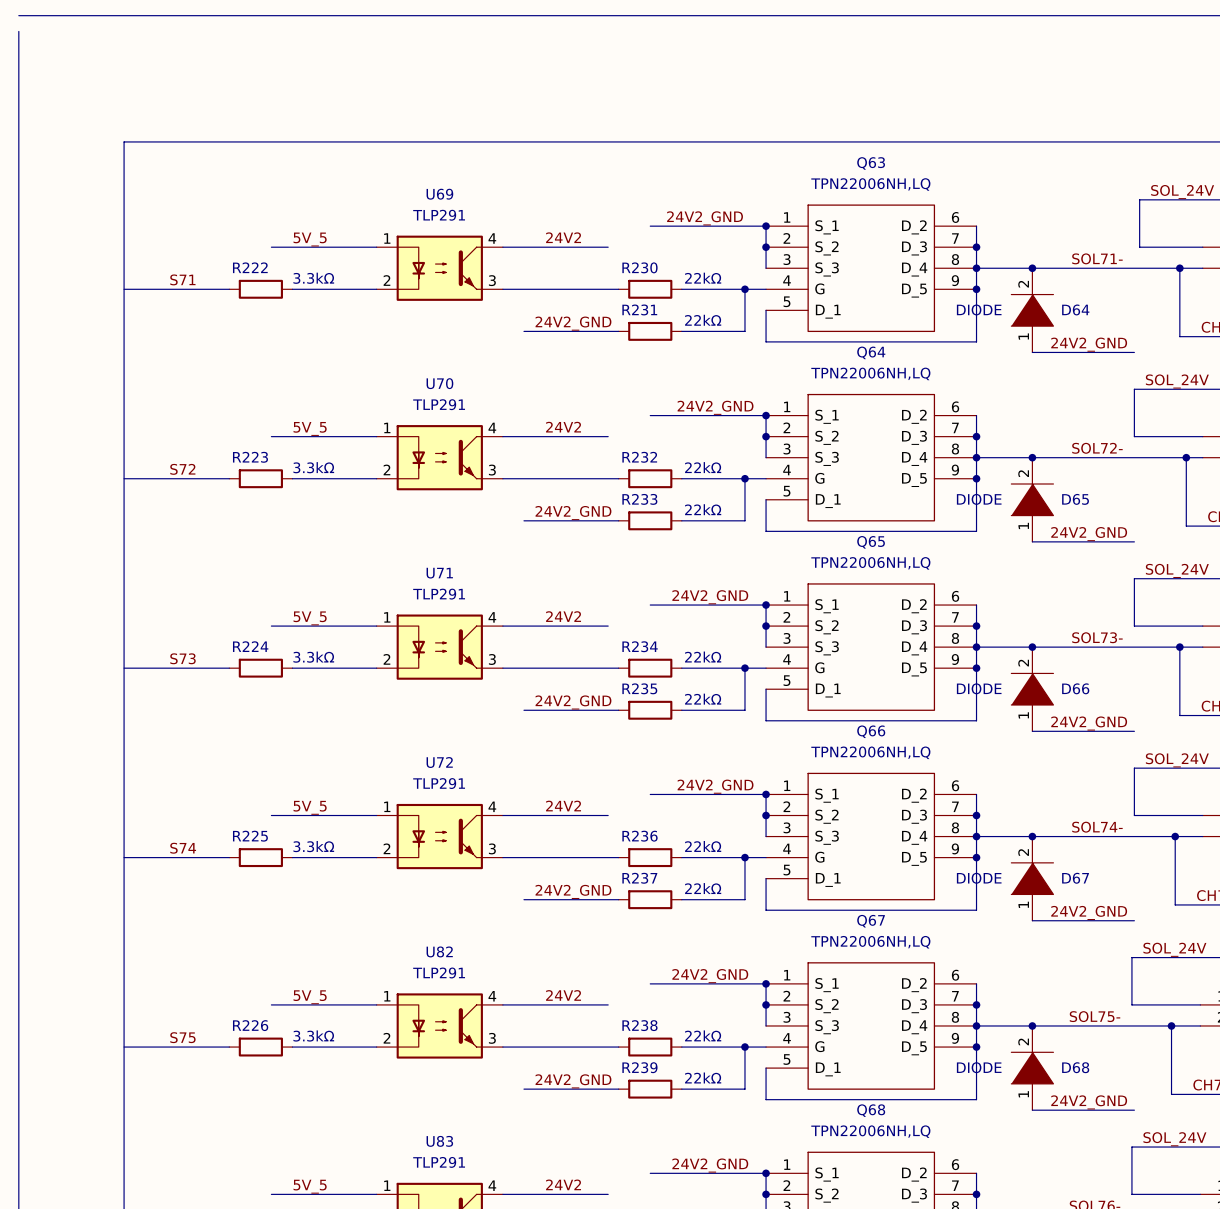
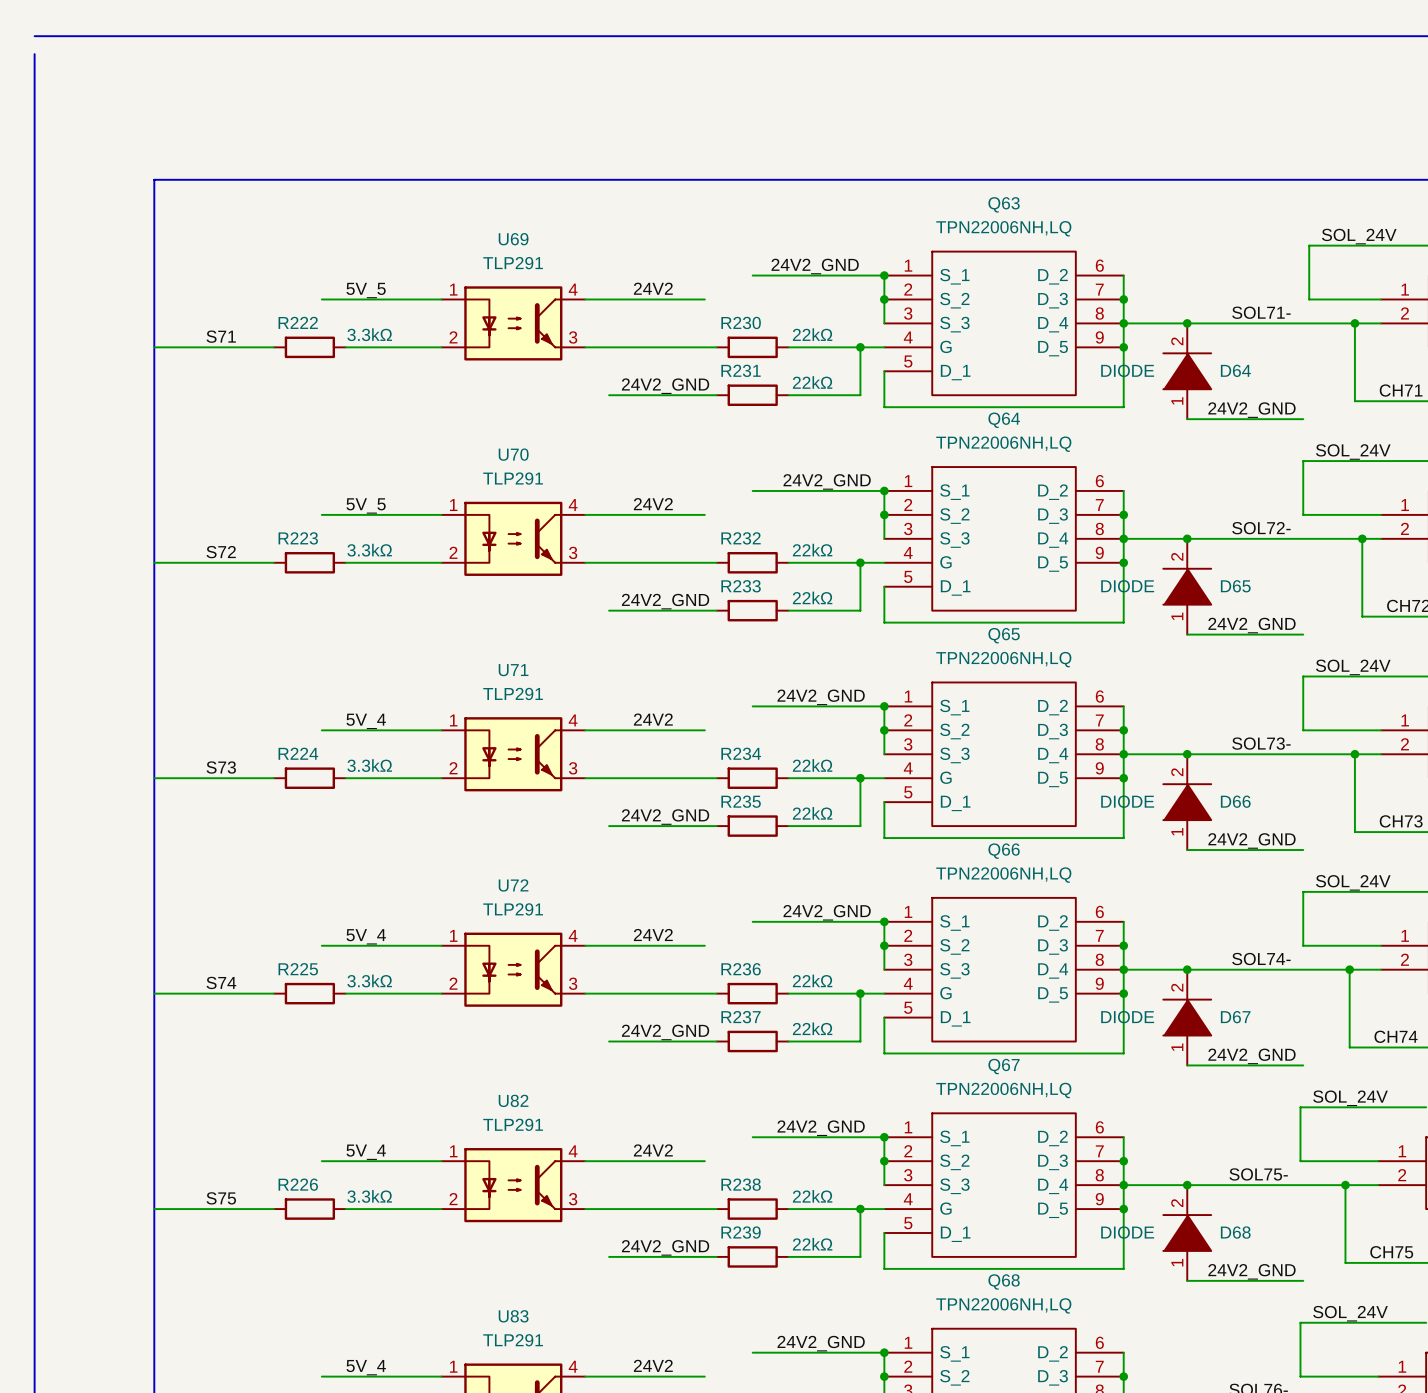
label: 5V_5 (310, 618) -> 5V_4 (366, 721)
label: 5V_5 (310, 807) -> 5V_4 (366, 936)
label: 5V_5 (310, 997) -> 5V_4 (366, 1152)
label: 5V_5 (310, 1186) -> 5V_4 (366, 1367)

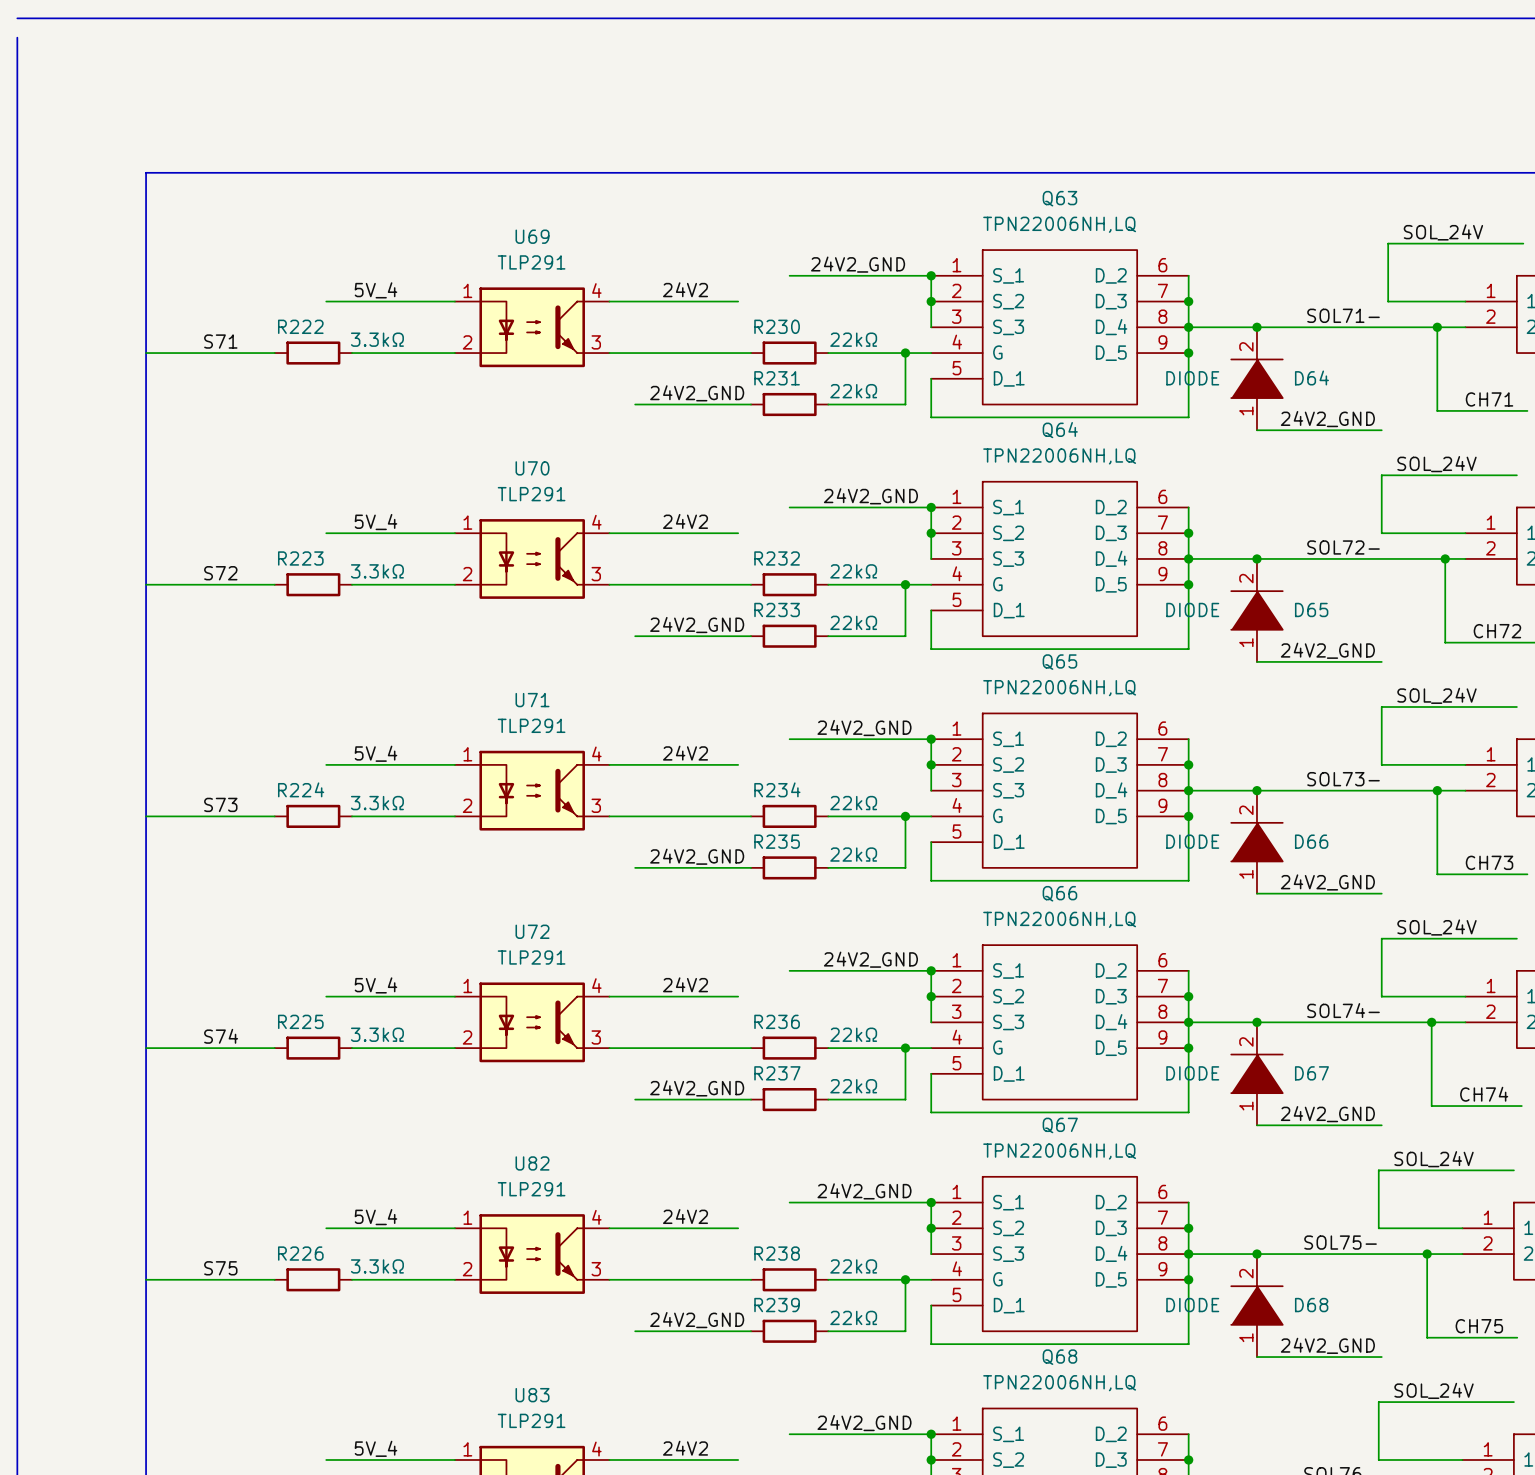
label: 5V_5 (366, 290) -> 5V_4 (376, 290)
label: 5V_5 (366, 505) -> 5V_4 (376, 522)

